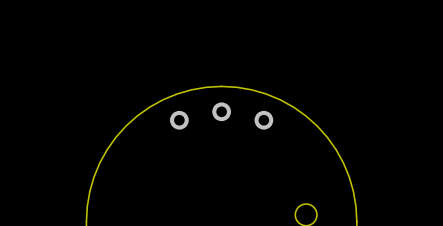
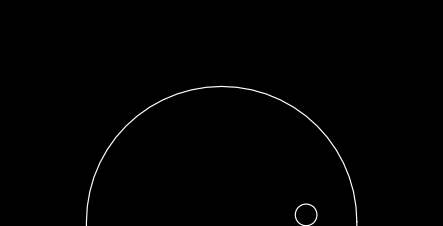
via: (221, 111) -> none
via: (179, 120) -> none
via: (263, 120) -> none

